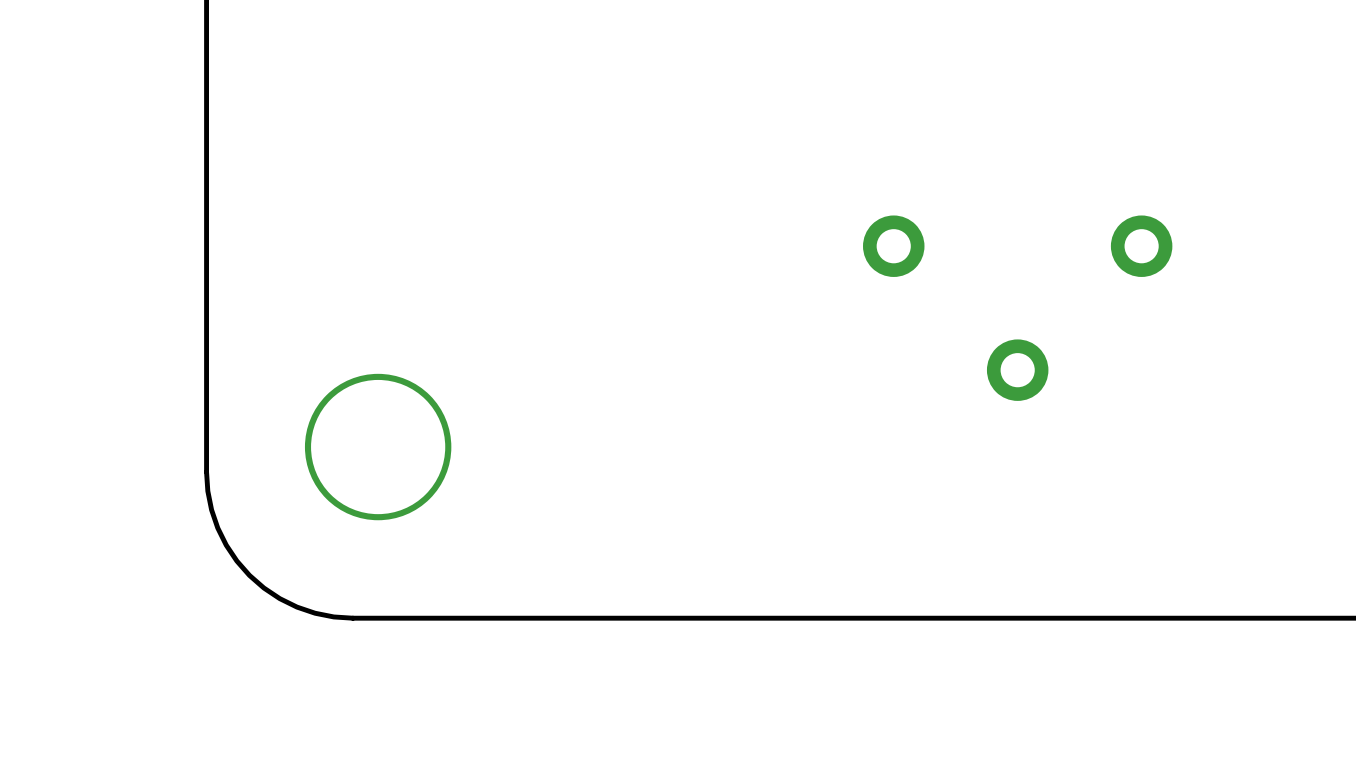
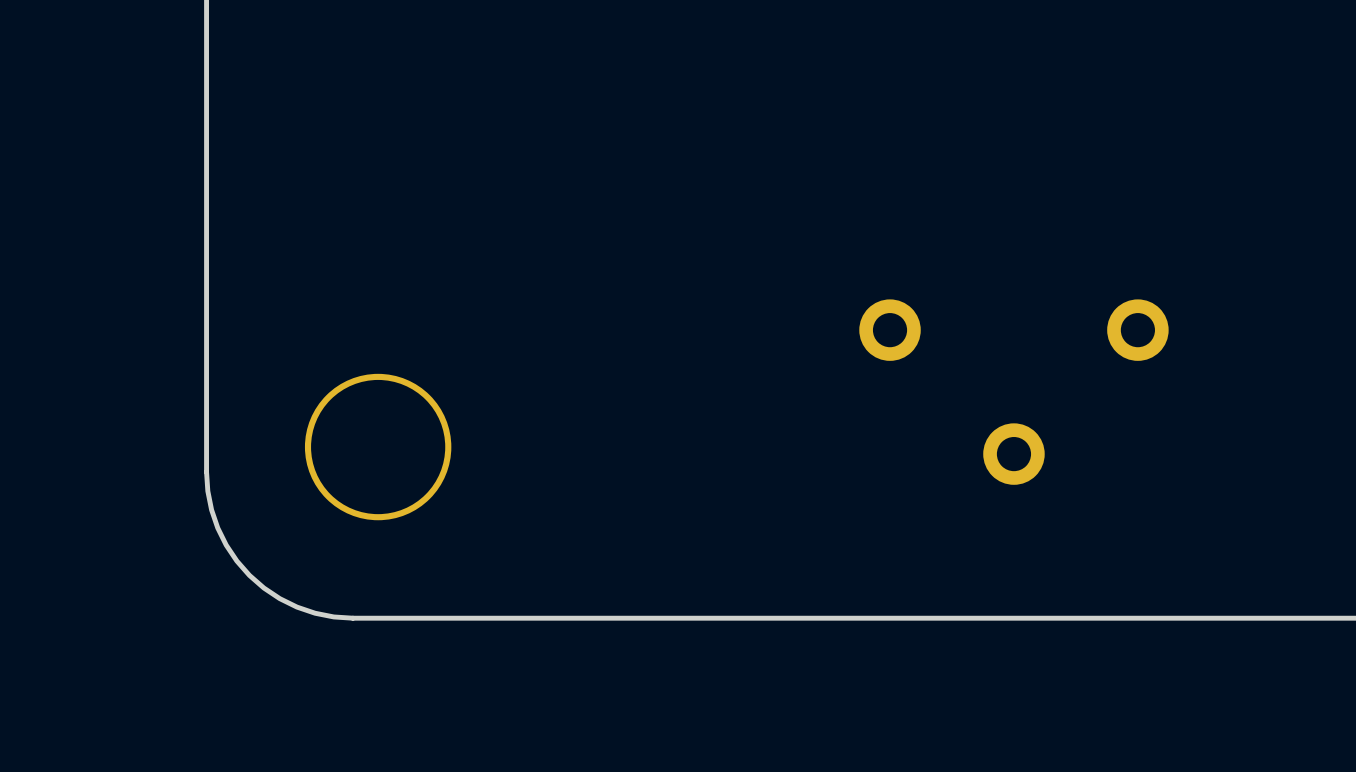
part position: (1017, 308) -> (1013, 392)

